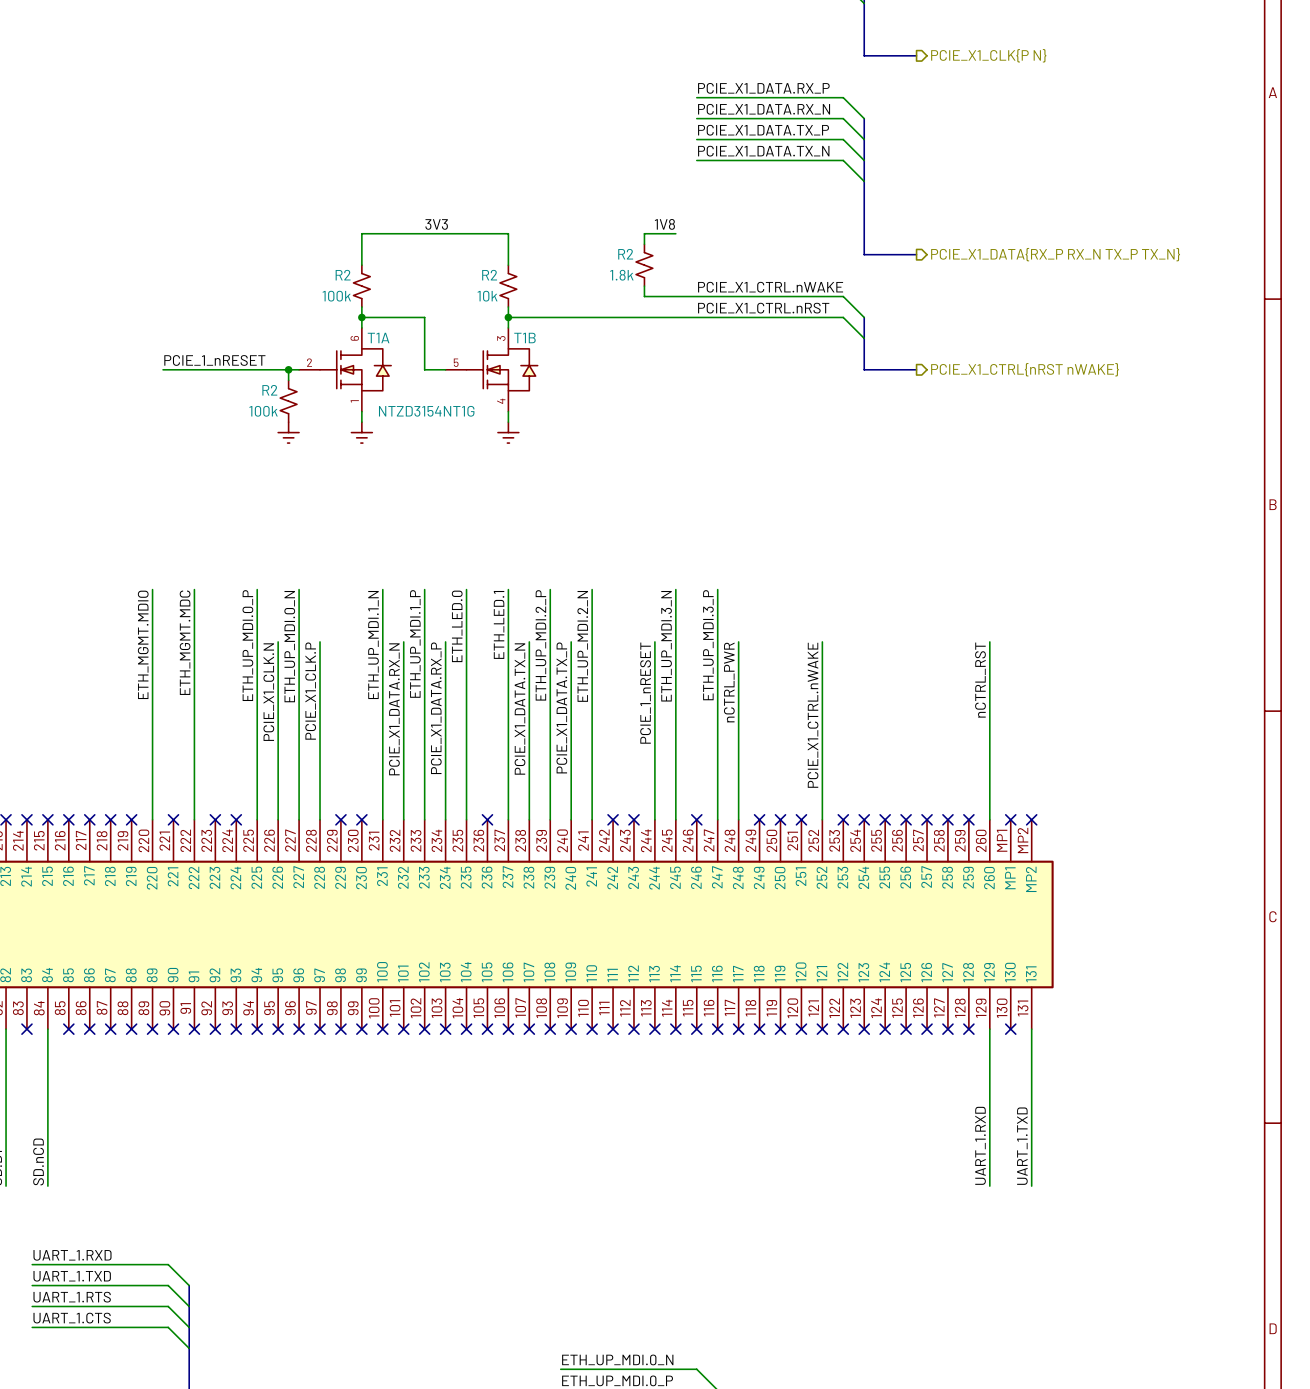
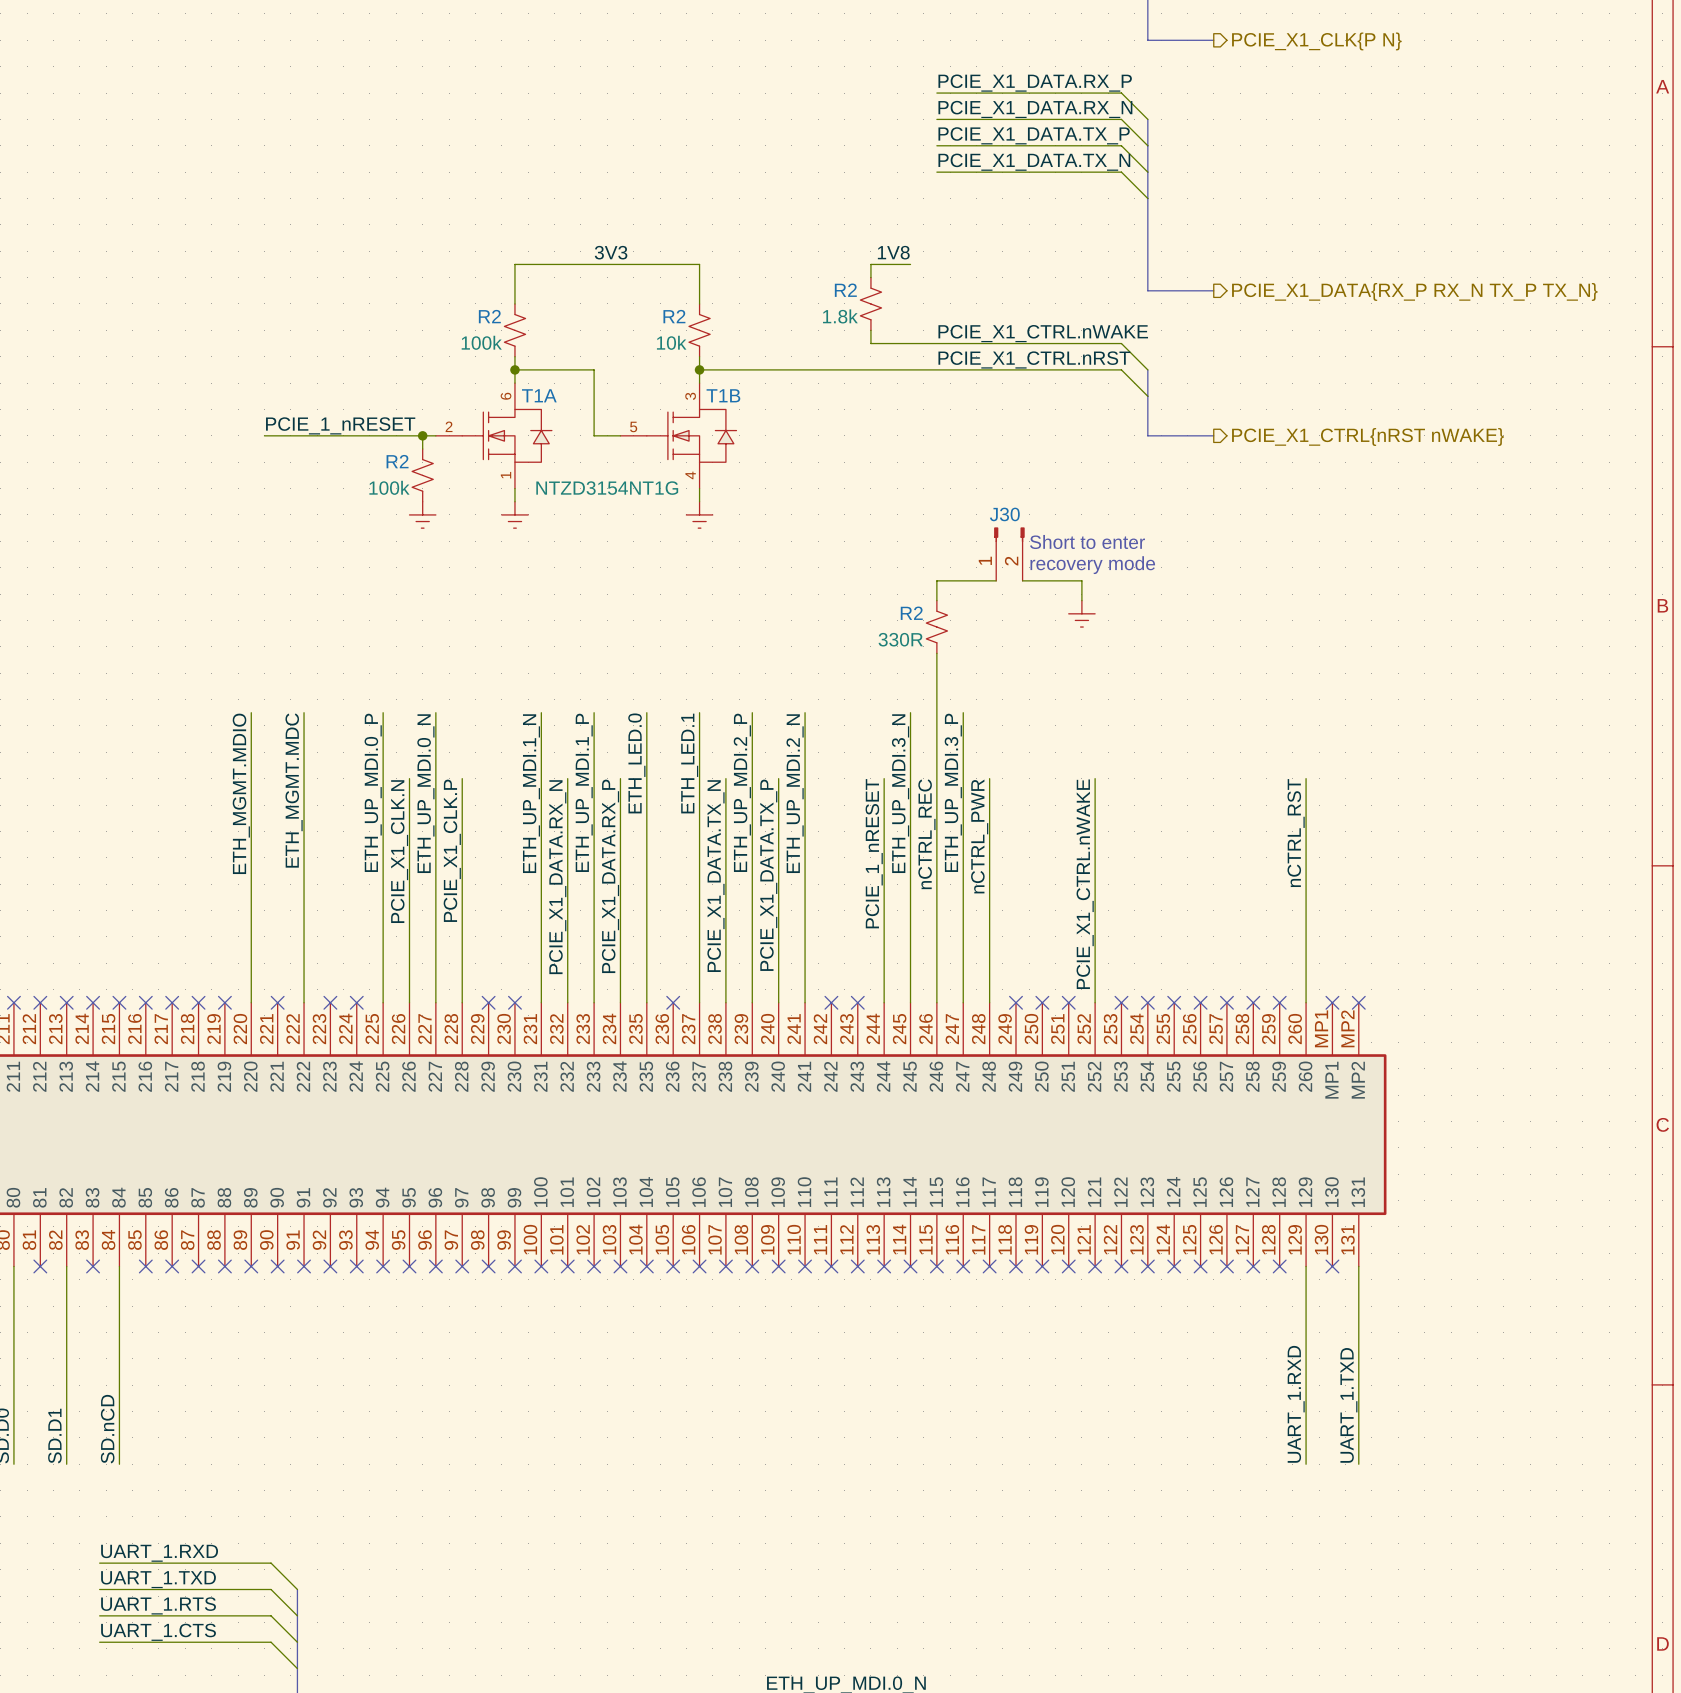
text: none -> Short to enter (1087, 541)
J30: none -> (1009, 554)
text: none -> recovery mode (1092, 565)
wire: none -> (996, 580) (936, 580) (936, 600)
wire: none -> (1022, 580) (1081, 580) (1081, 600)
power symbol: none -> (1081, 613)
R2: none -> 330R (936, 627)
wire: none -> (936, 653) (936, 1002)
label: none -> nCTRL_REC (926, 834)
no-connect mark: (696, 819) -> none

